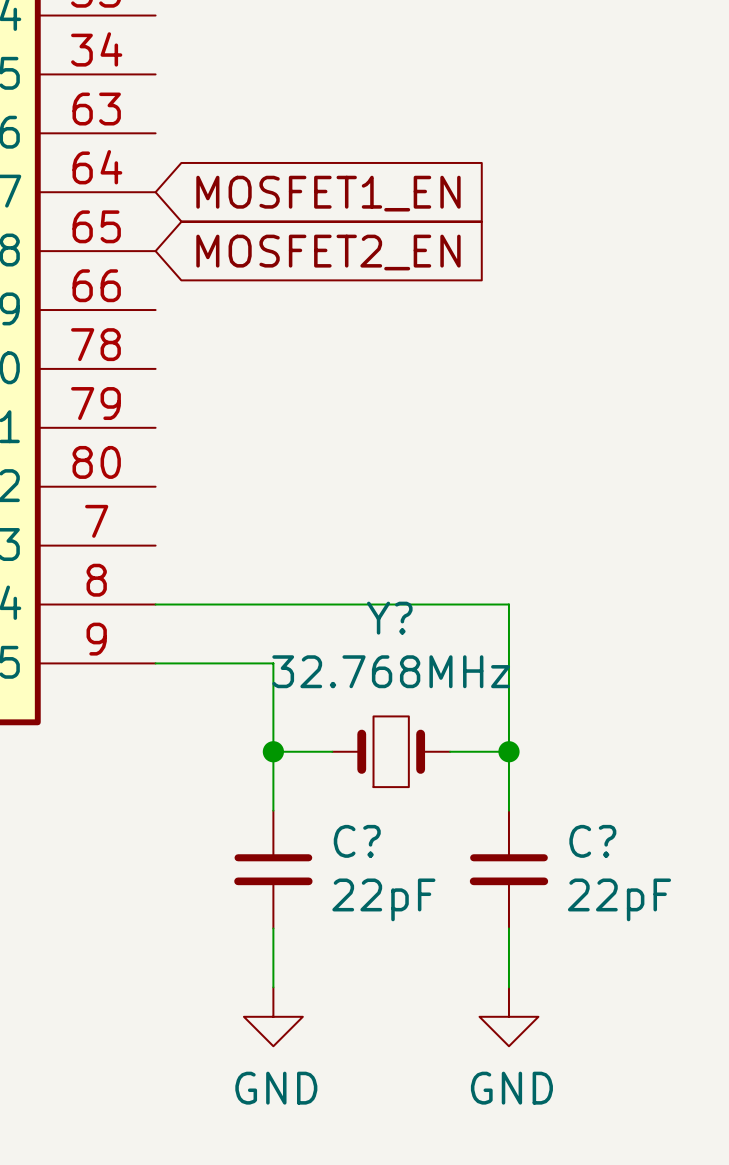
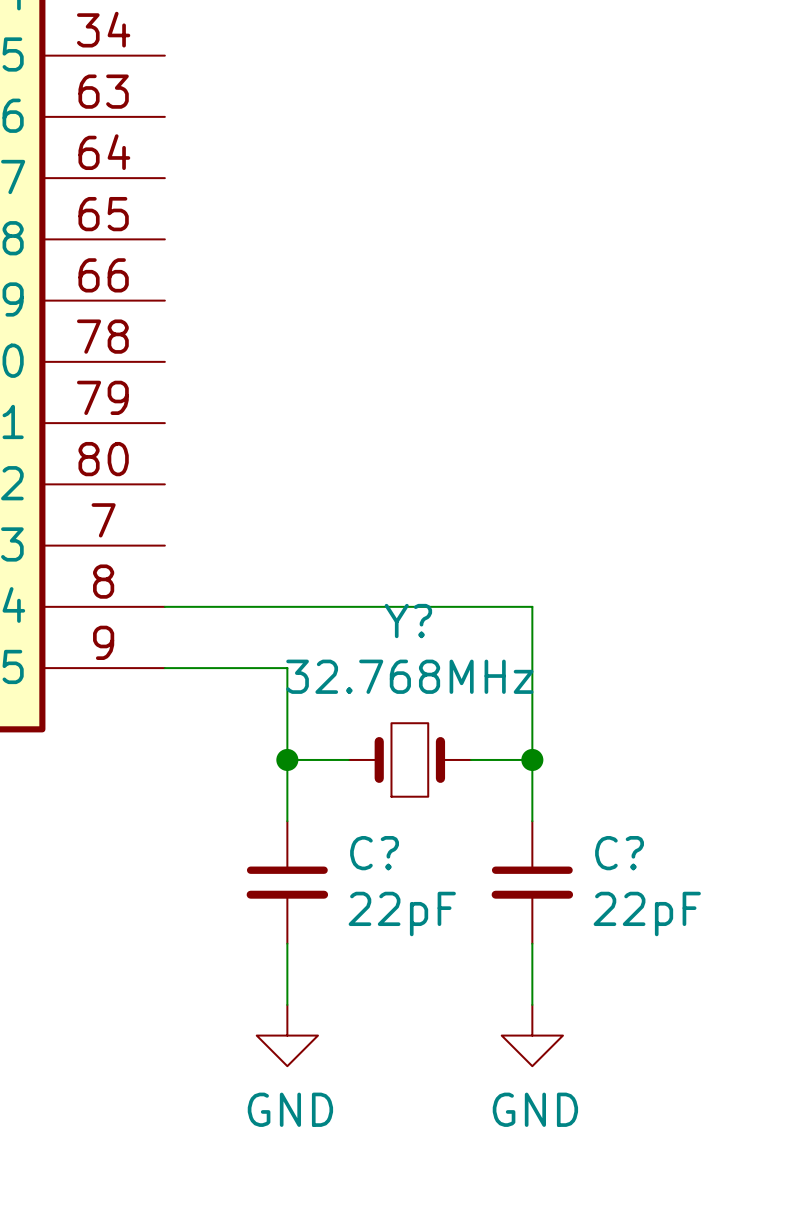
global label: MOSFET1_EN (328, 193) -> none
global label: MOSFET2_EN (328, 252) -> none

